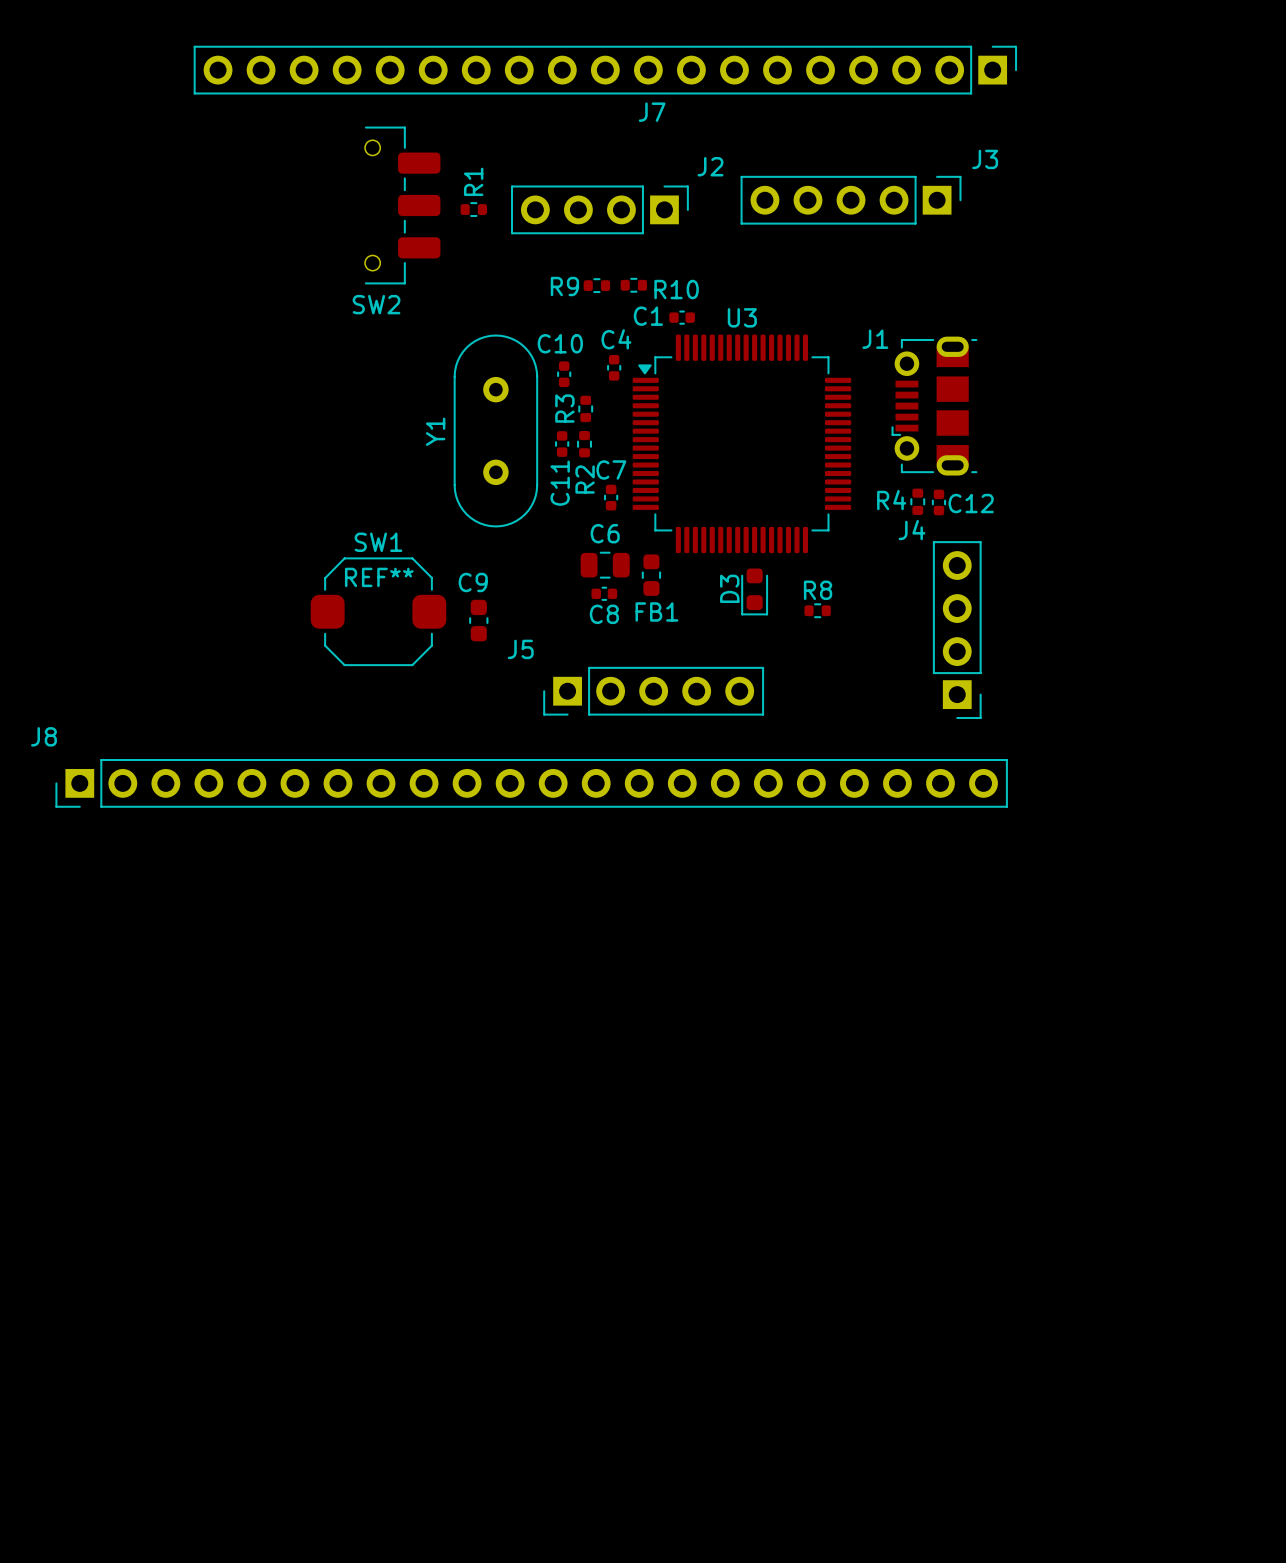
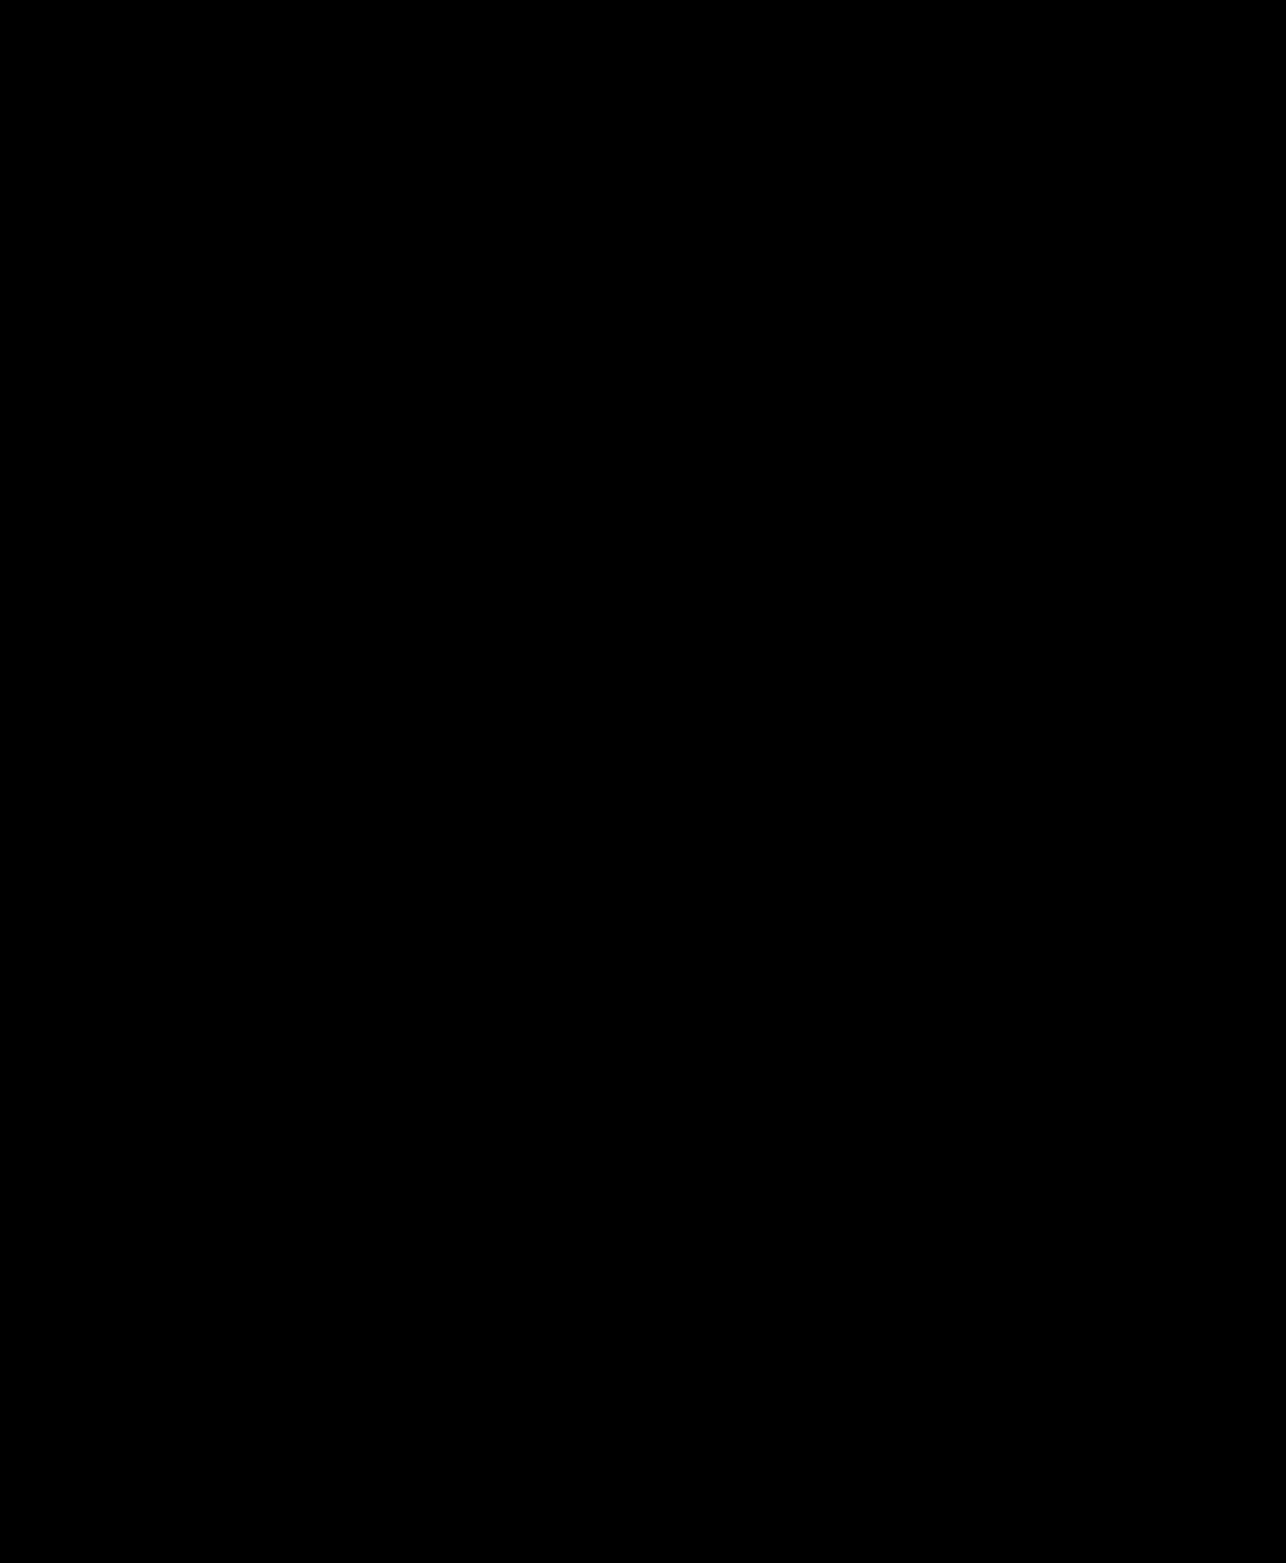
J7: (605, 70) -> none
J3: (851, 200) -> none
SW2: (402, 205) -> none
R1: (473, 209) -> none
J2: (599, 209) -> none
R9: (596, 285) -> none
R10: (633, 285) -> none
C1: (682, 317) -> none
C4: (614, 367) -> none
C10: (564, 374) -> none
J1: (934, 406) -> none
R3: (585, 408) -> none
Y1: (495, 430) -> none
U3: (741, 443) -> none
C11: (562, 444) -> none
R2: (584, 444) -> none
C7: (611, 497) -> none
R4: (917, 501) -> none
C12: (938, 502) -> none
C6: (605, 565) -> none
FB1: (651, 575) -> none
D3: (754, 591) -> none
C8: (604, 593) -> none
R8: (817, 610) -> none
SW1: (378, 611) -> none
C9: (478, 620) -> none
J4: (957, 630) -> none
J5: (653, 691) -> none
J8: (531, 783) -> none

